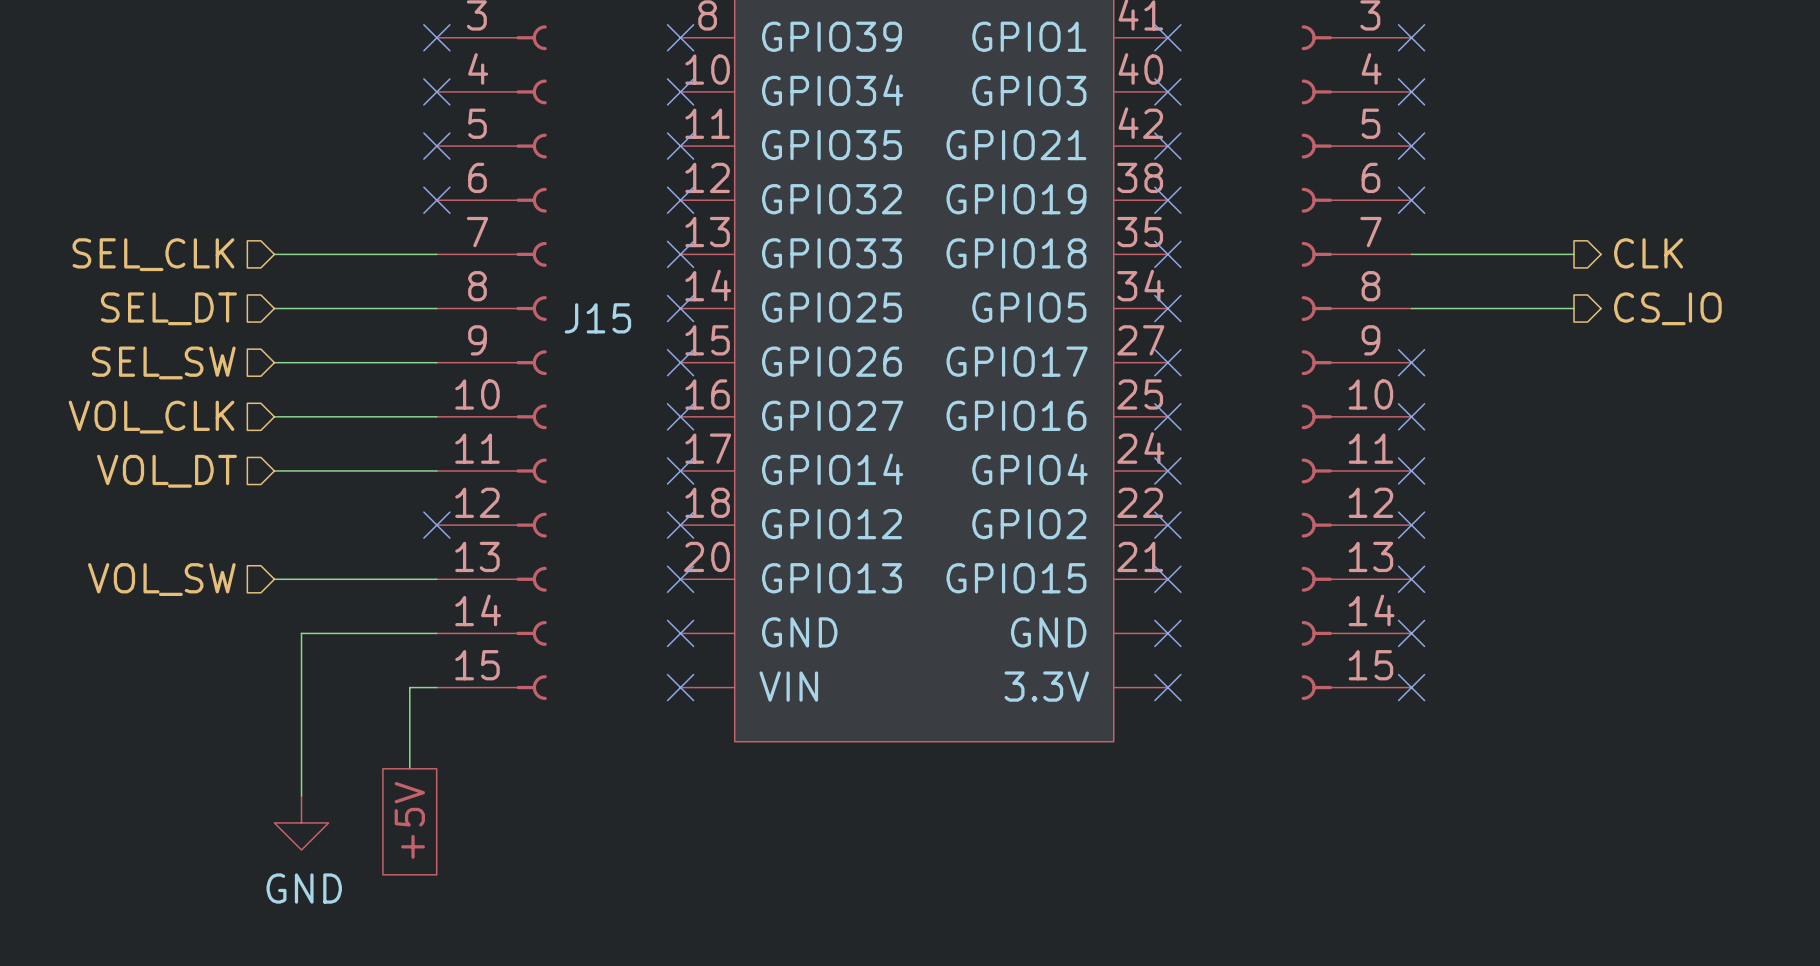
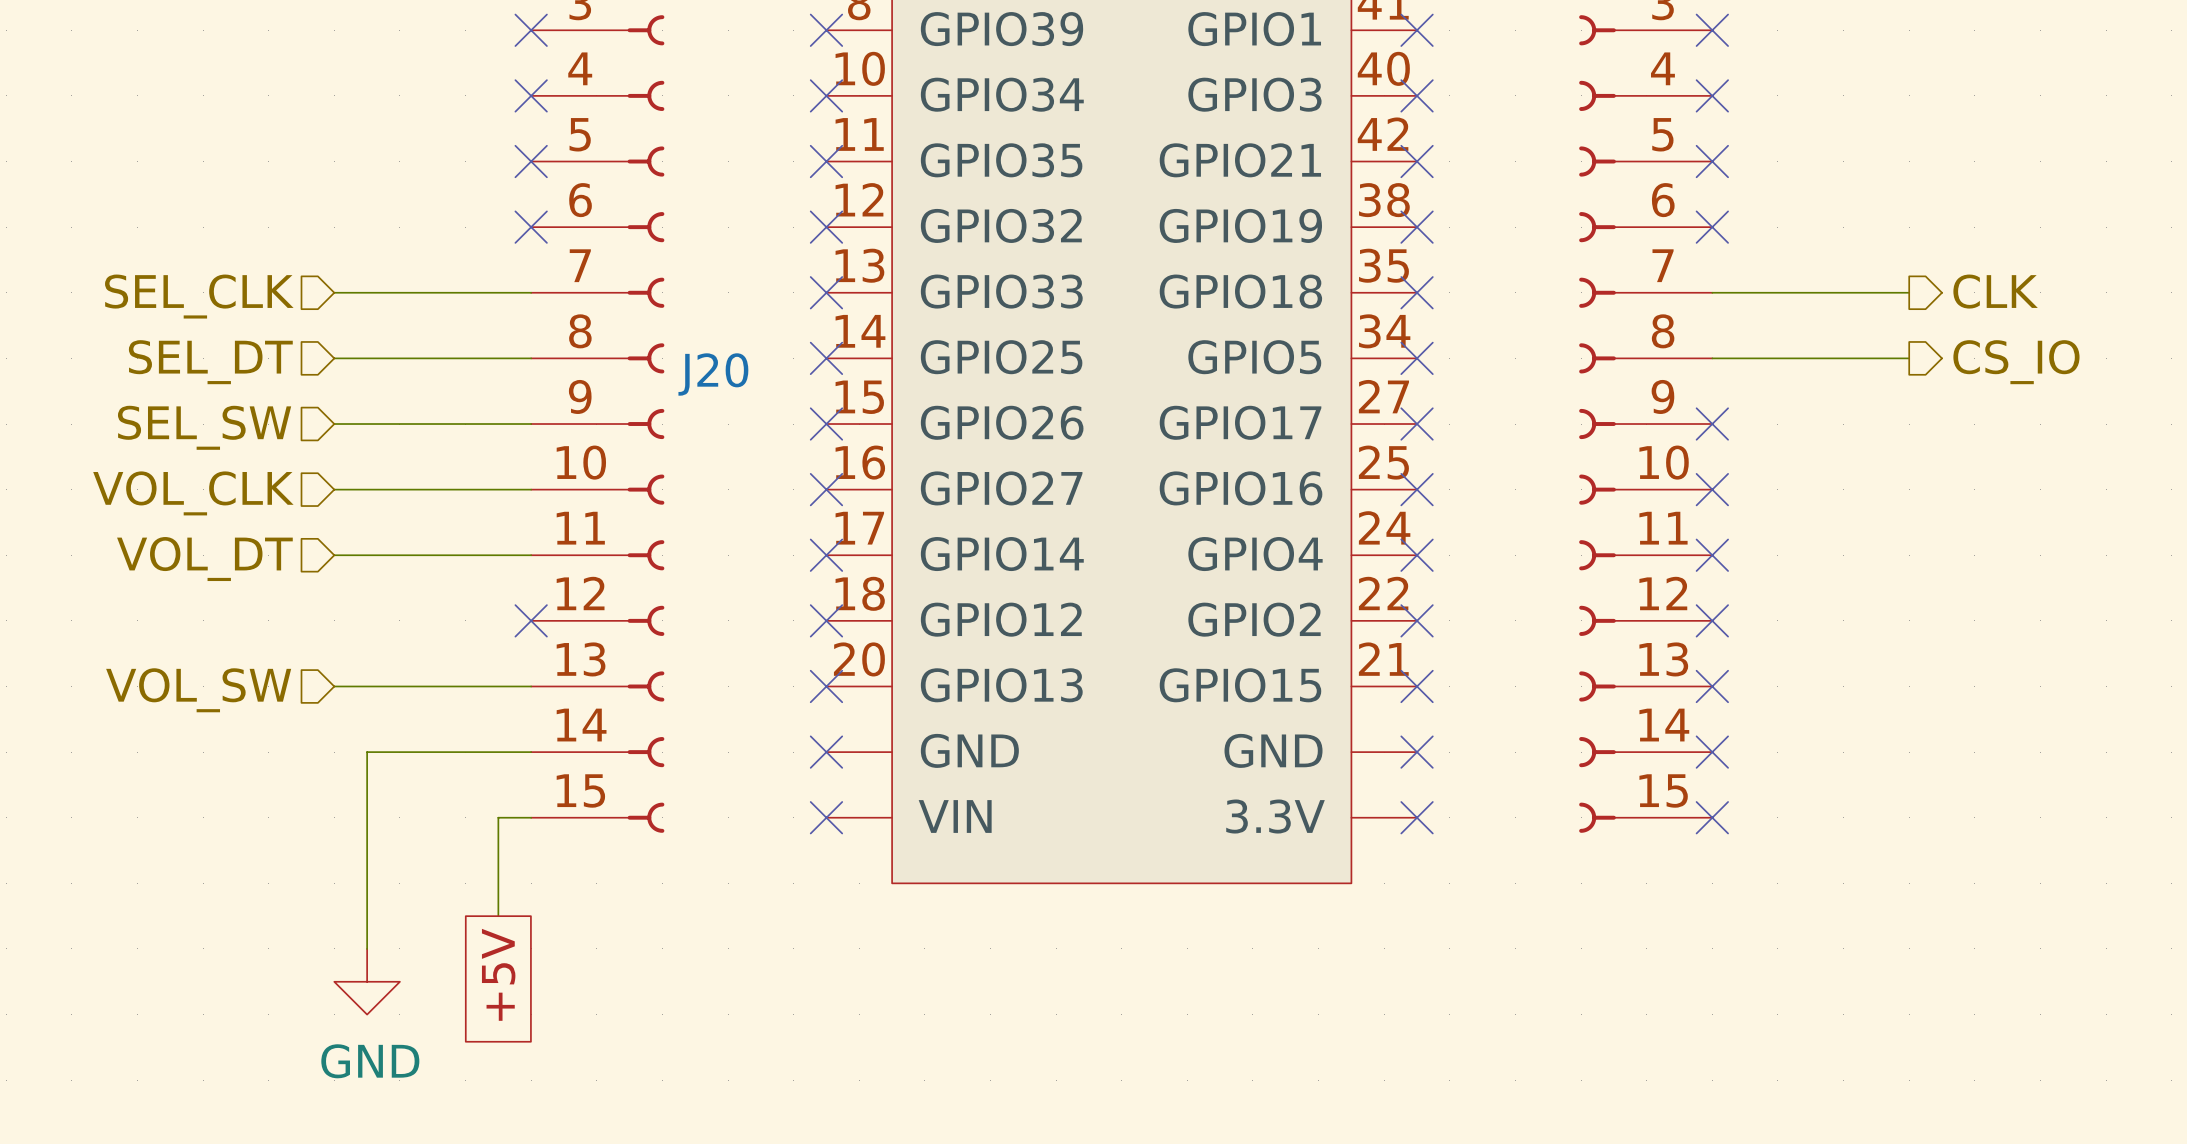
J15 name: J15 (597, 318) -> J20 (713, 374)

